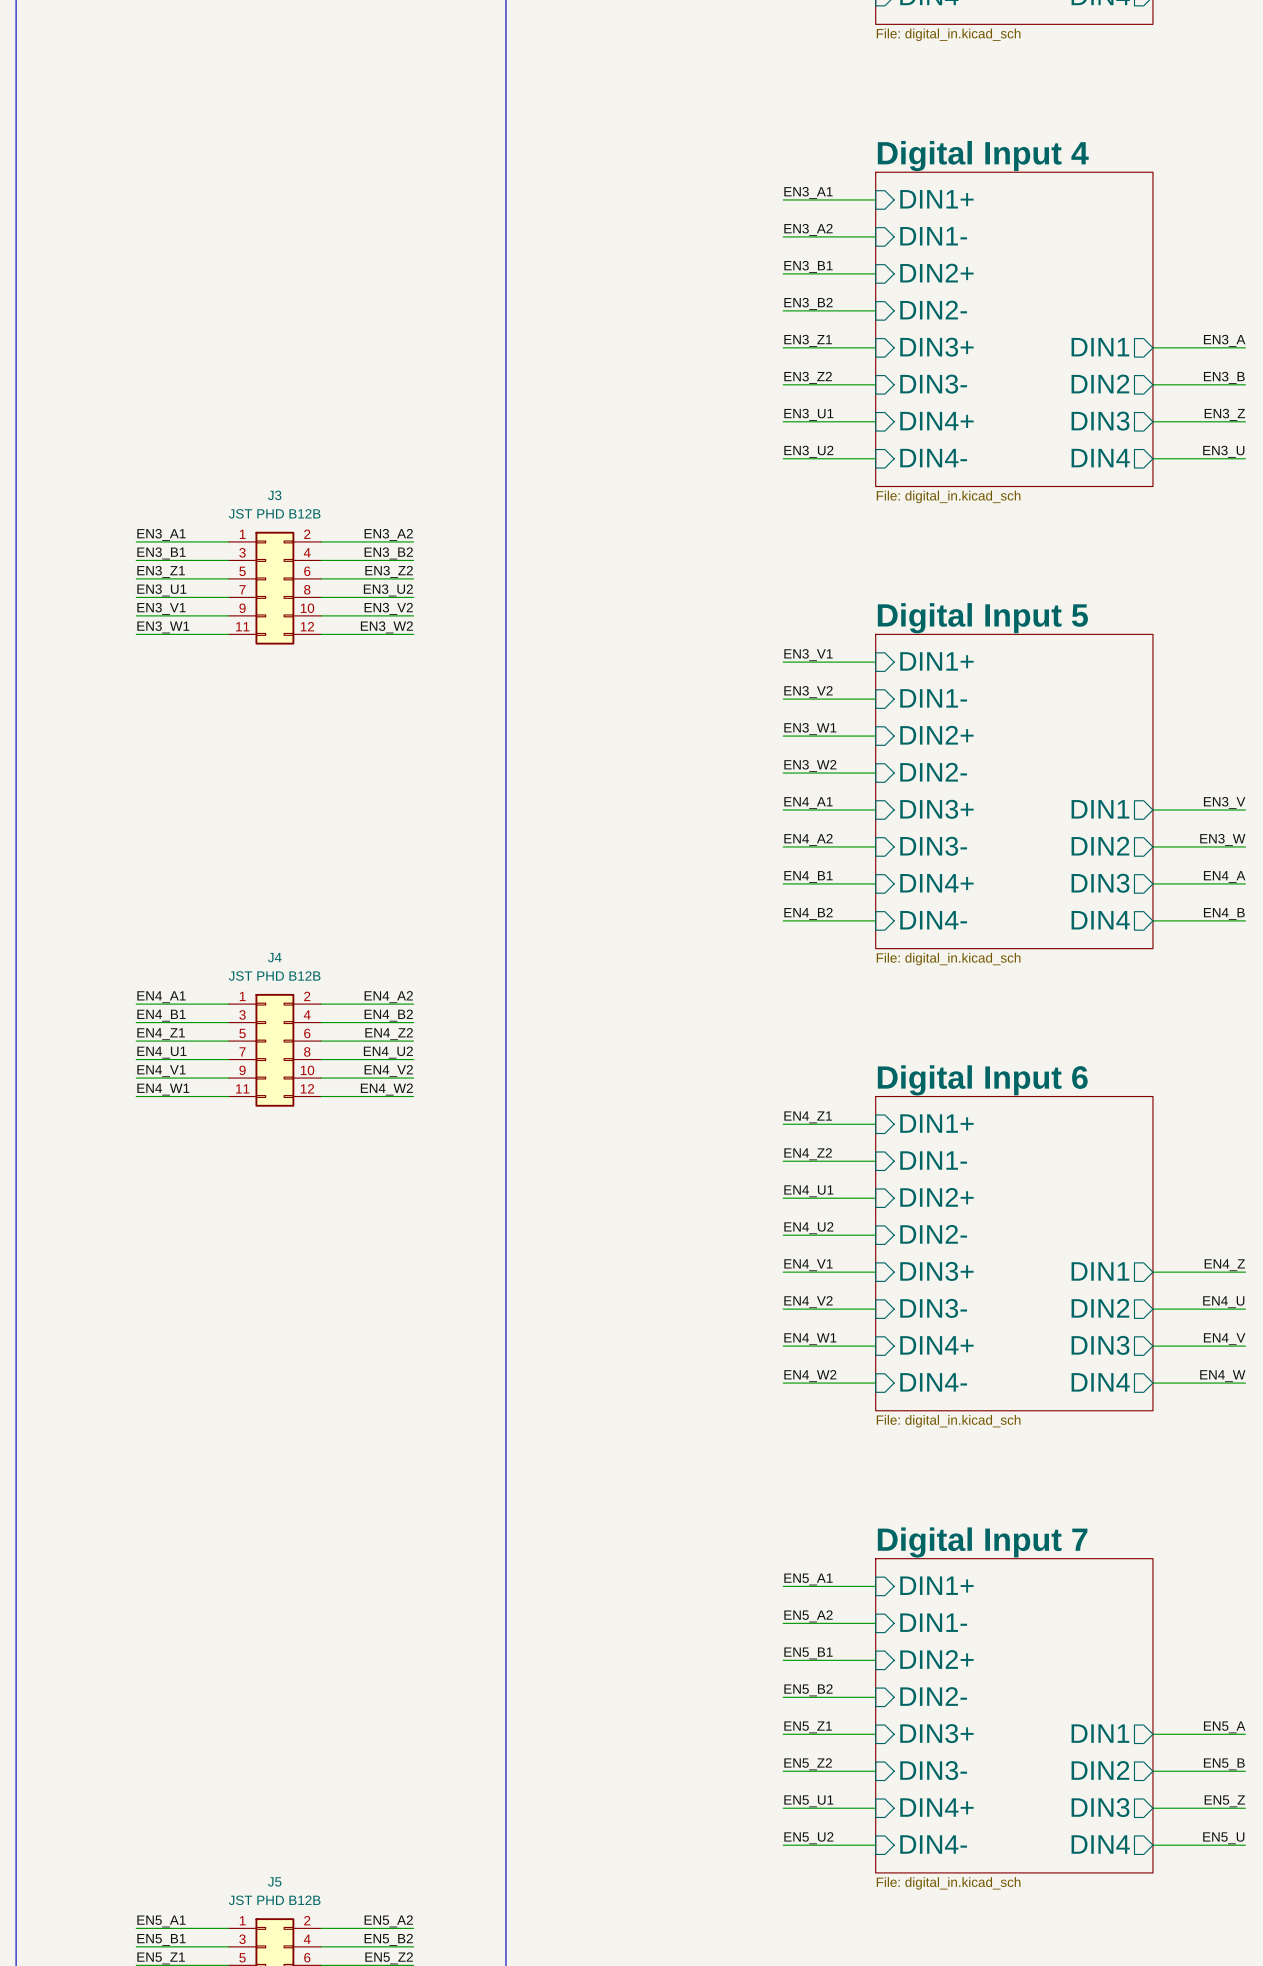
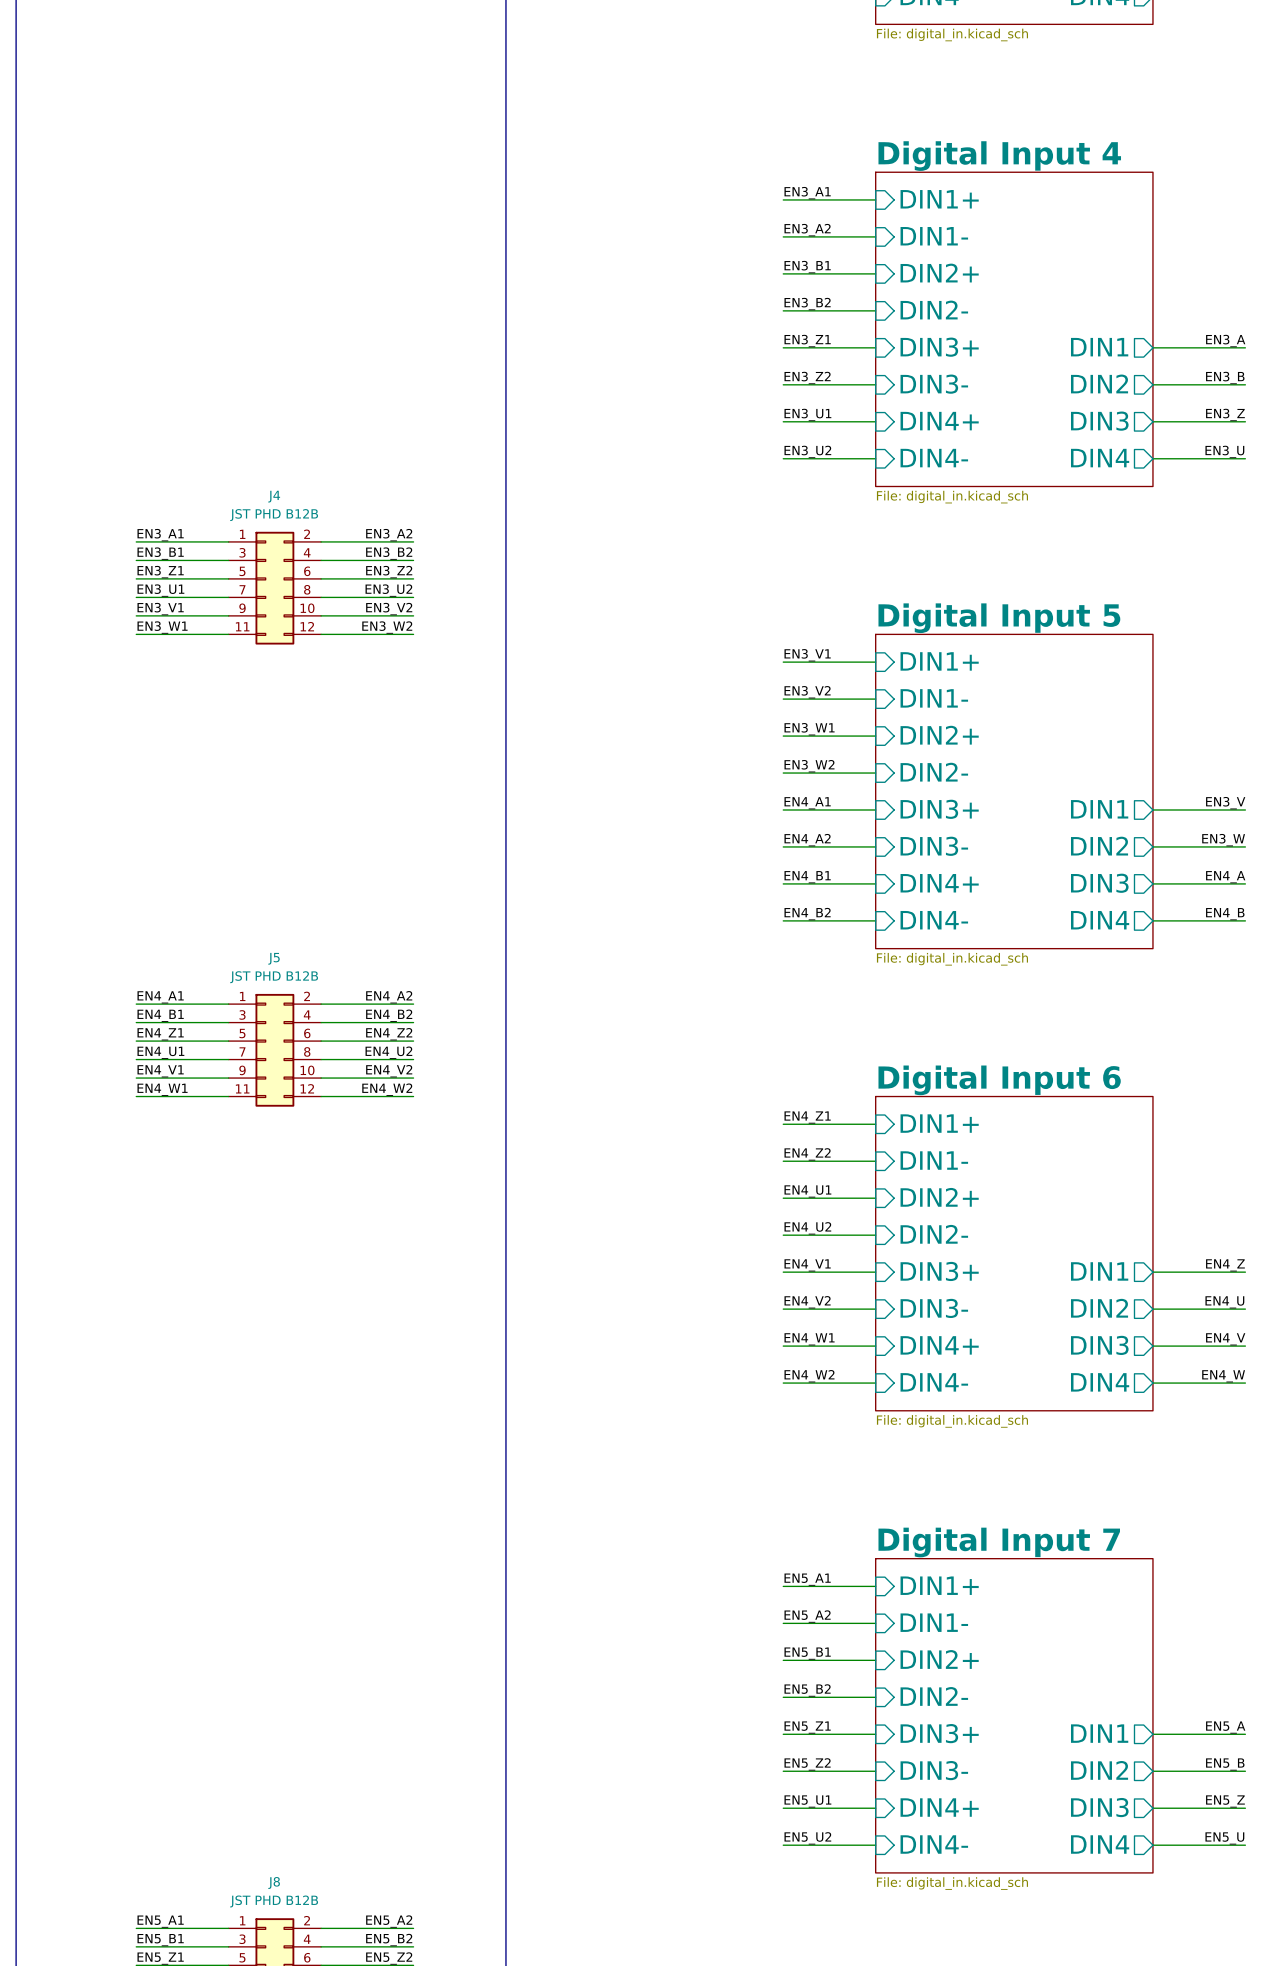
J3 name: J3 (274, 495) -> J4 (274, 496)
J4 name: J4 (274, 957) -> J5 (274, 958)
J5 name: J5 (274, 1881) -> J8 (274, 1883)

